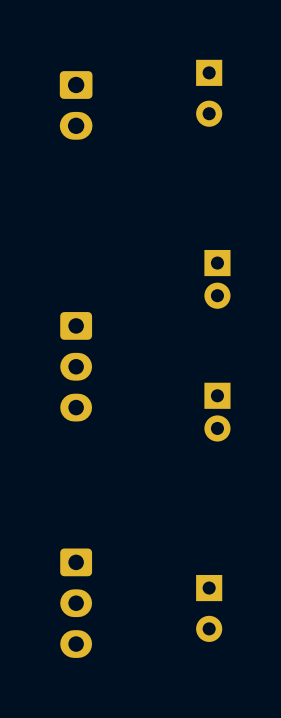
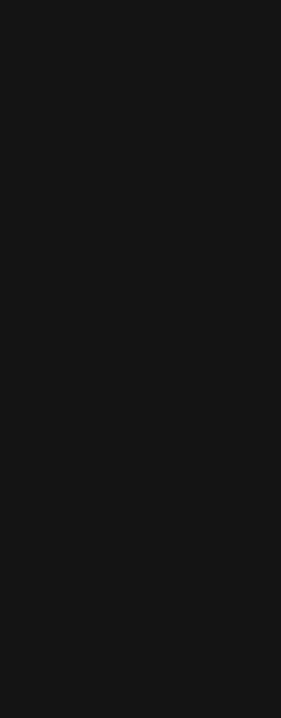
part: (209, 93) -> none
part: (76, 105) -> none
part: (217, 279) -> none
part: (76, 366) -> none
part: (217, 412) -> none
part: (76, 603) -> none
part: (209, 608) -> none

